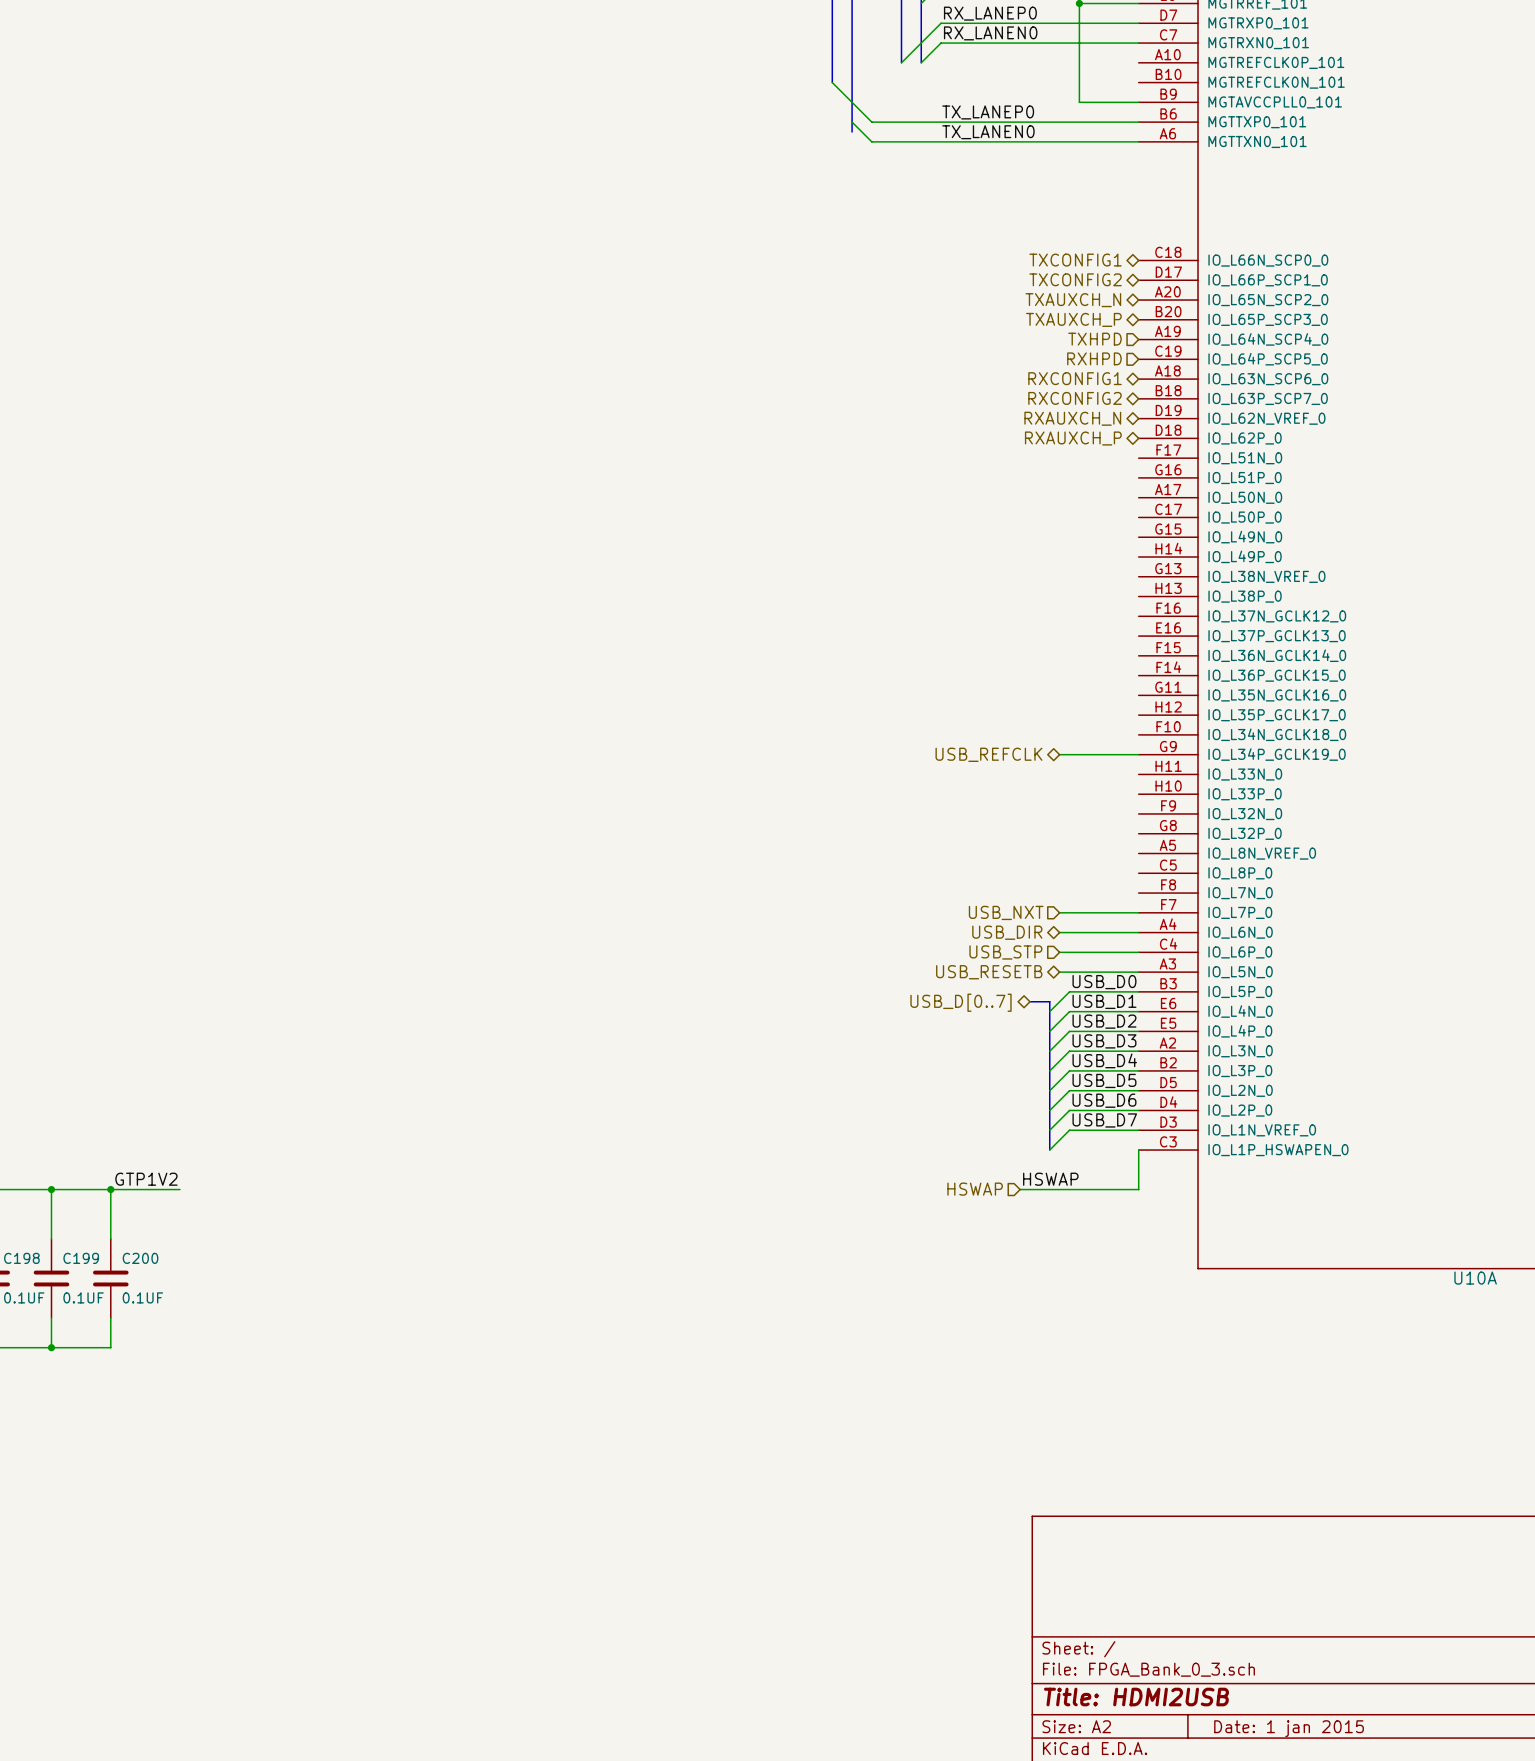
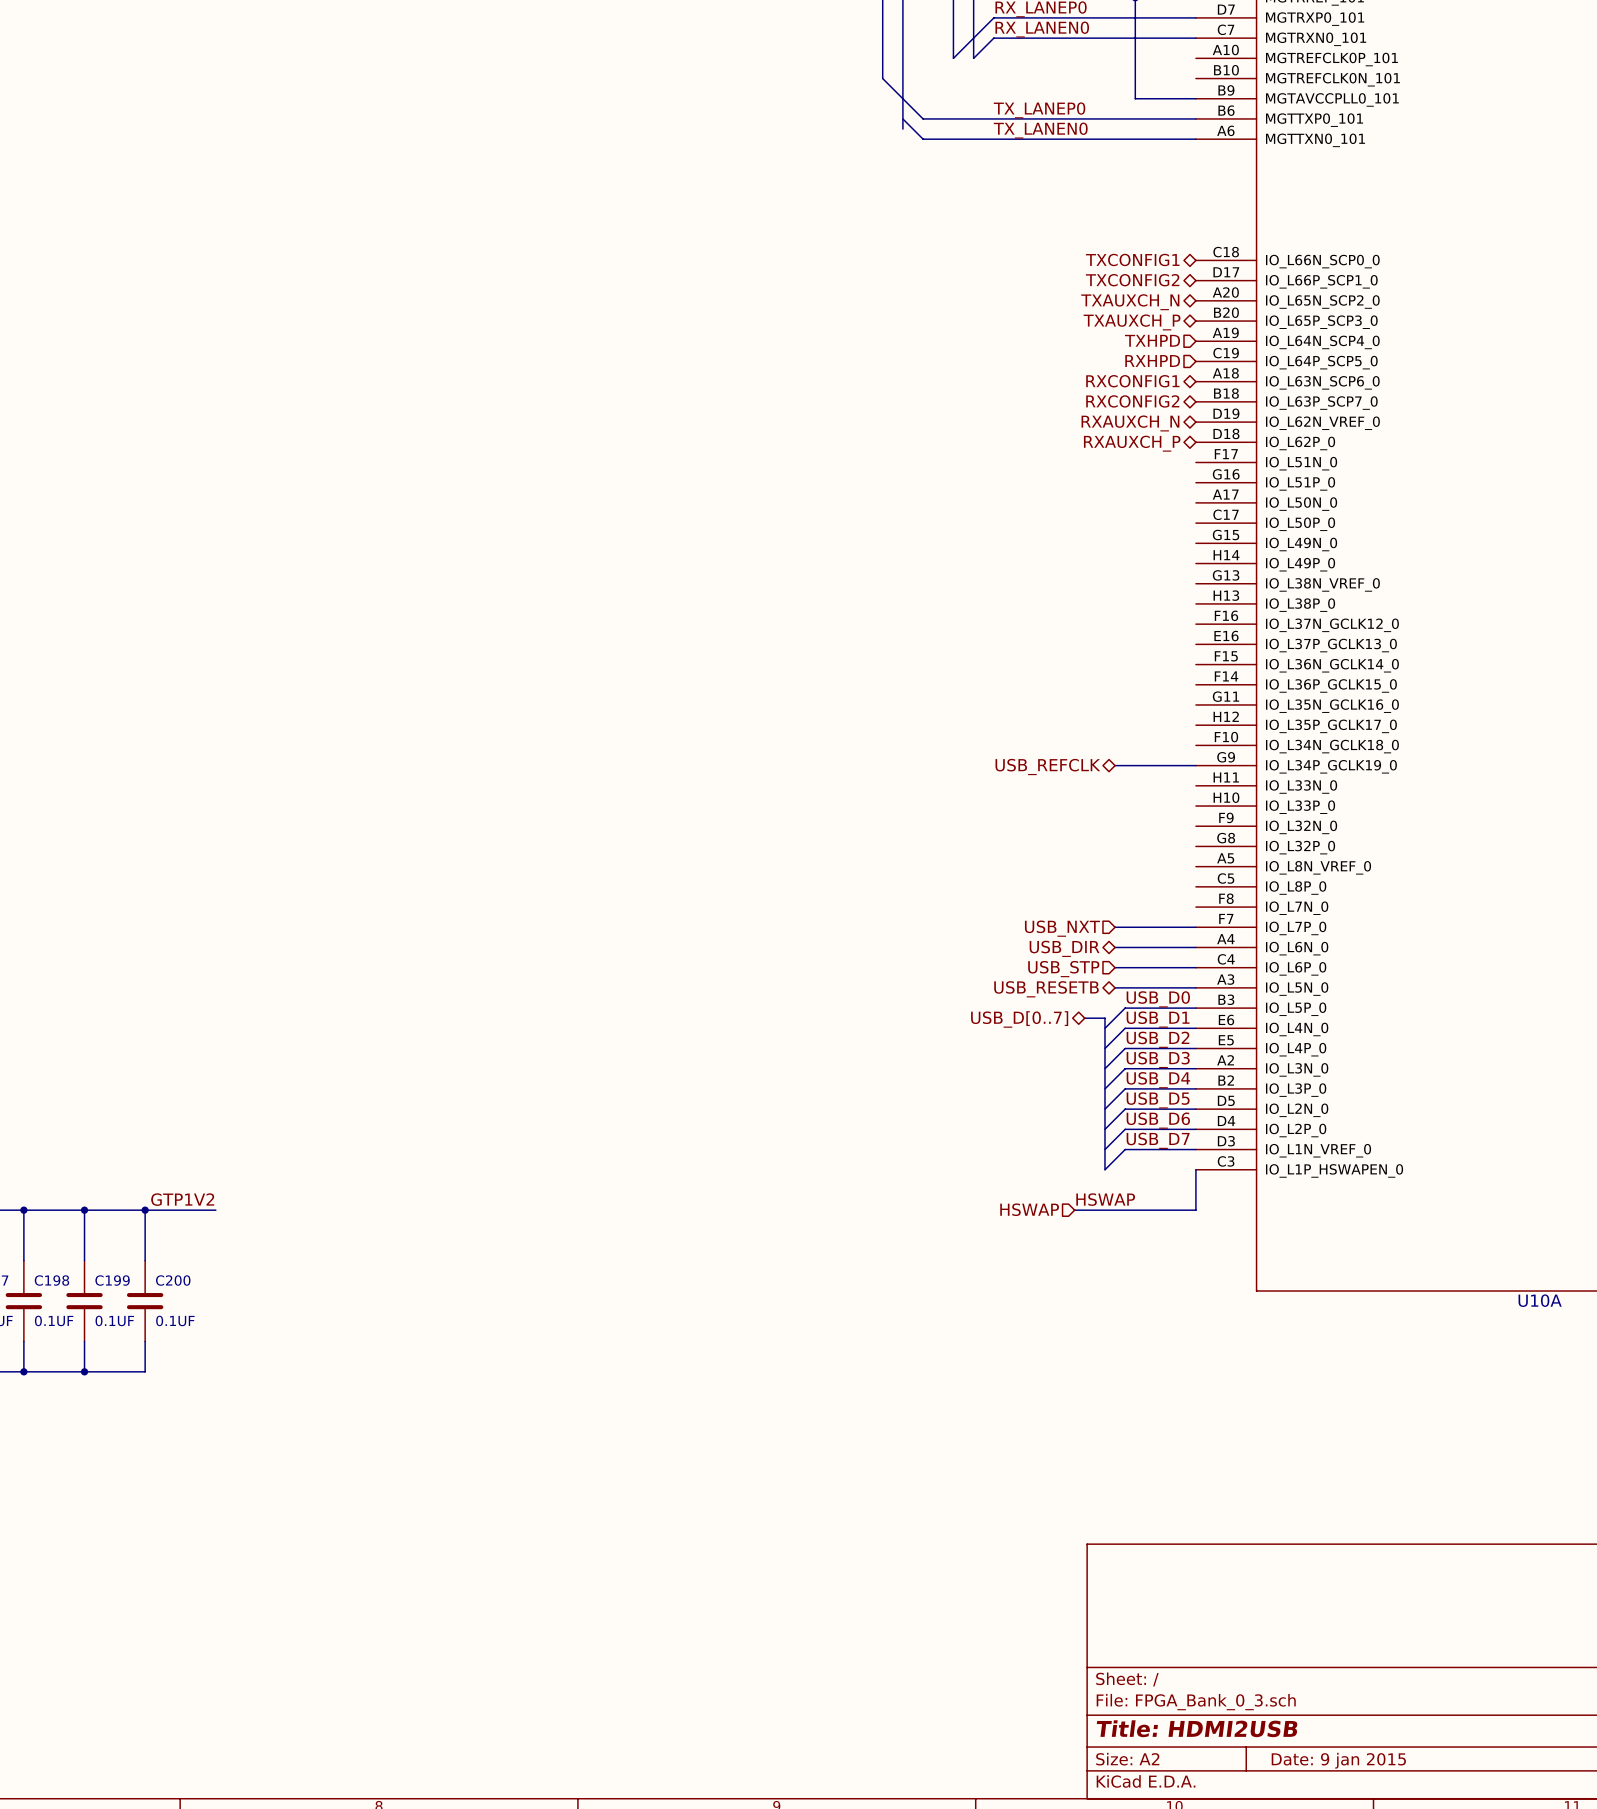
title block: Date: 1 jan 2015 (1289, 1728) -> Date: 9 jan 2015 (1338, 1760)

